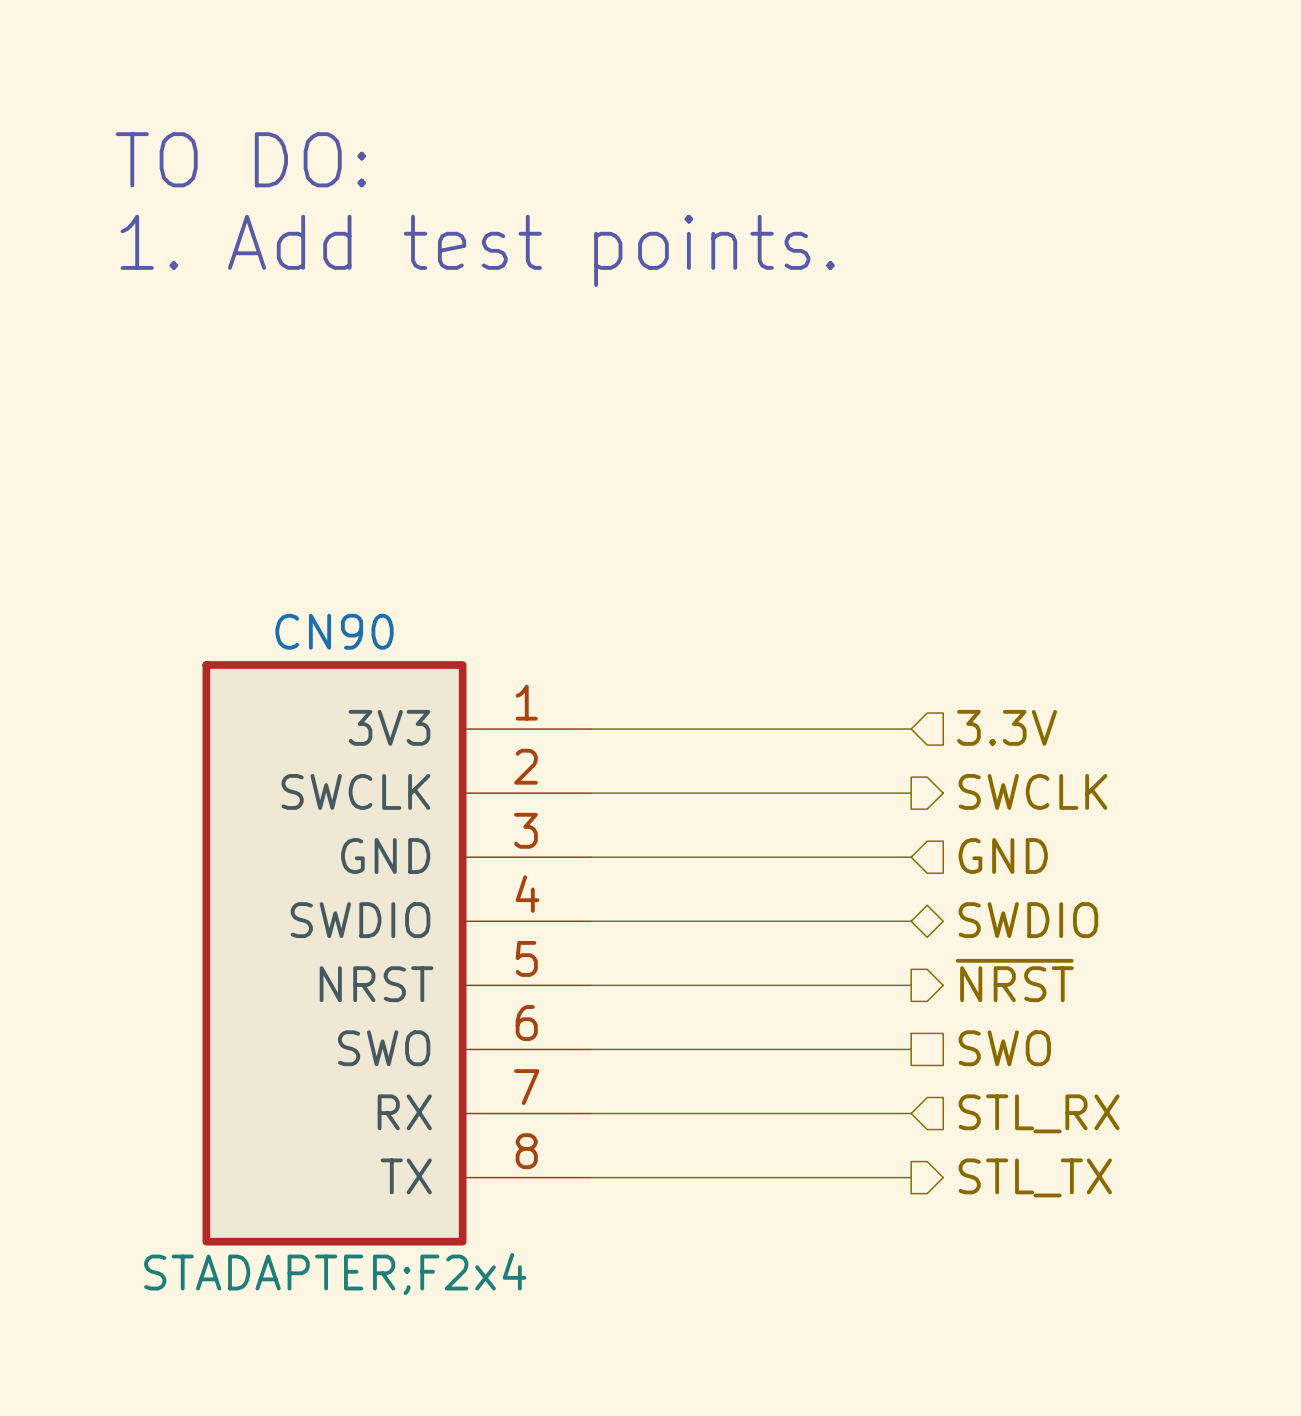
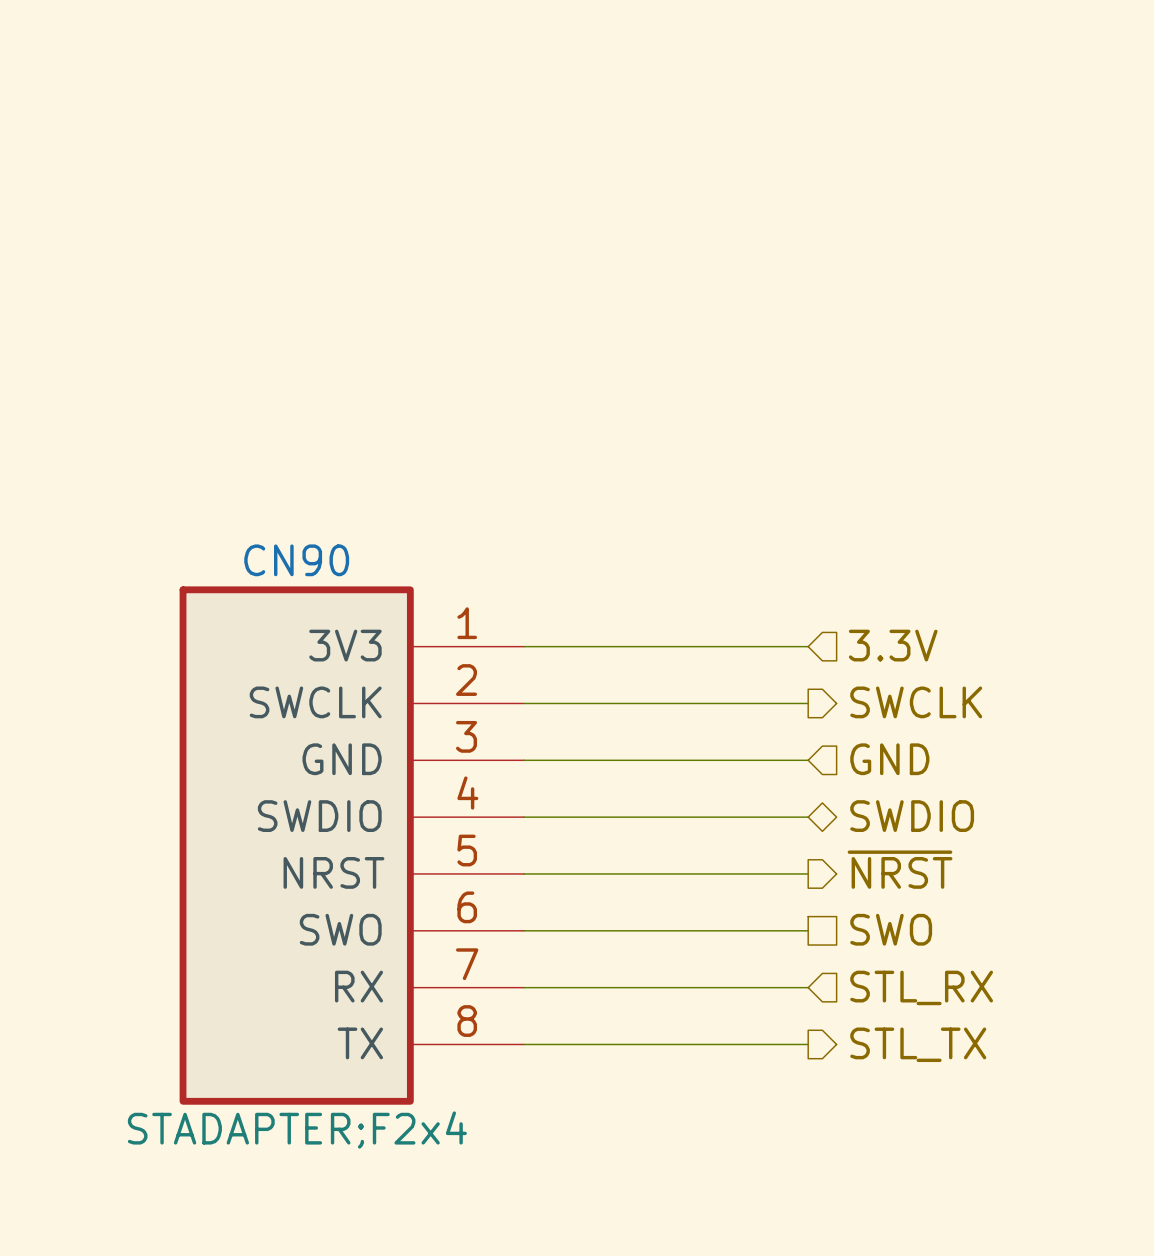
text: TO DO: (240, 159) -> none
text: 1. Add test points. (477, 250) -> none

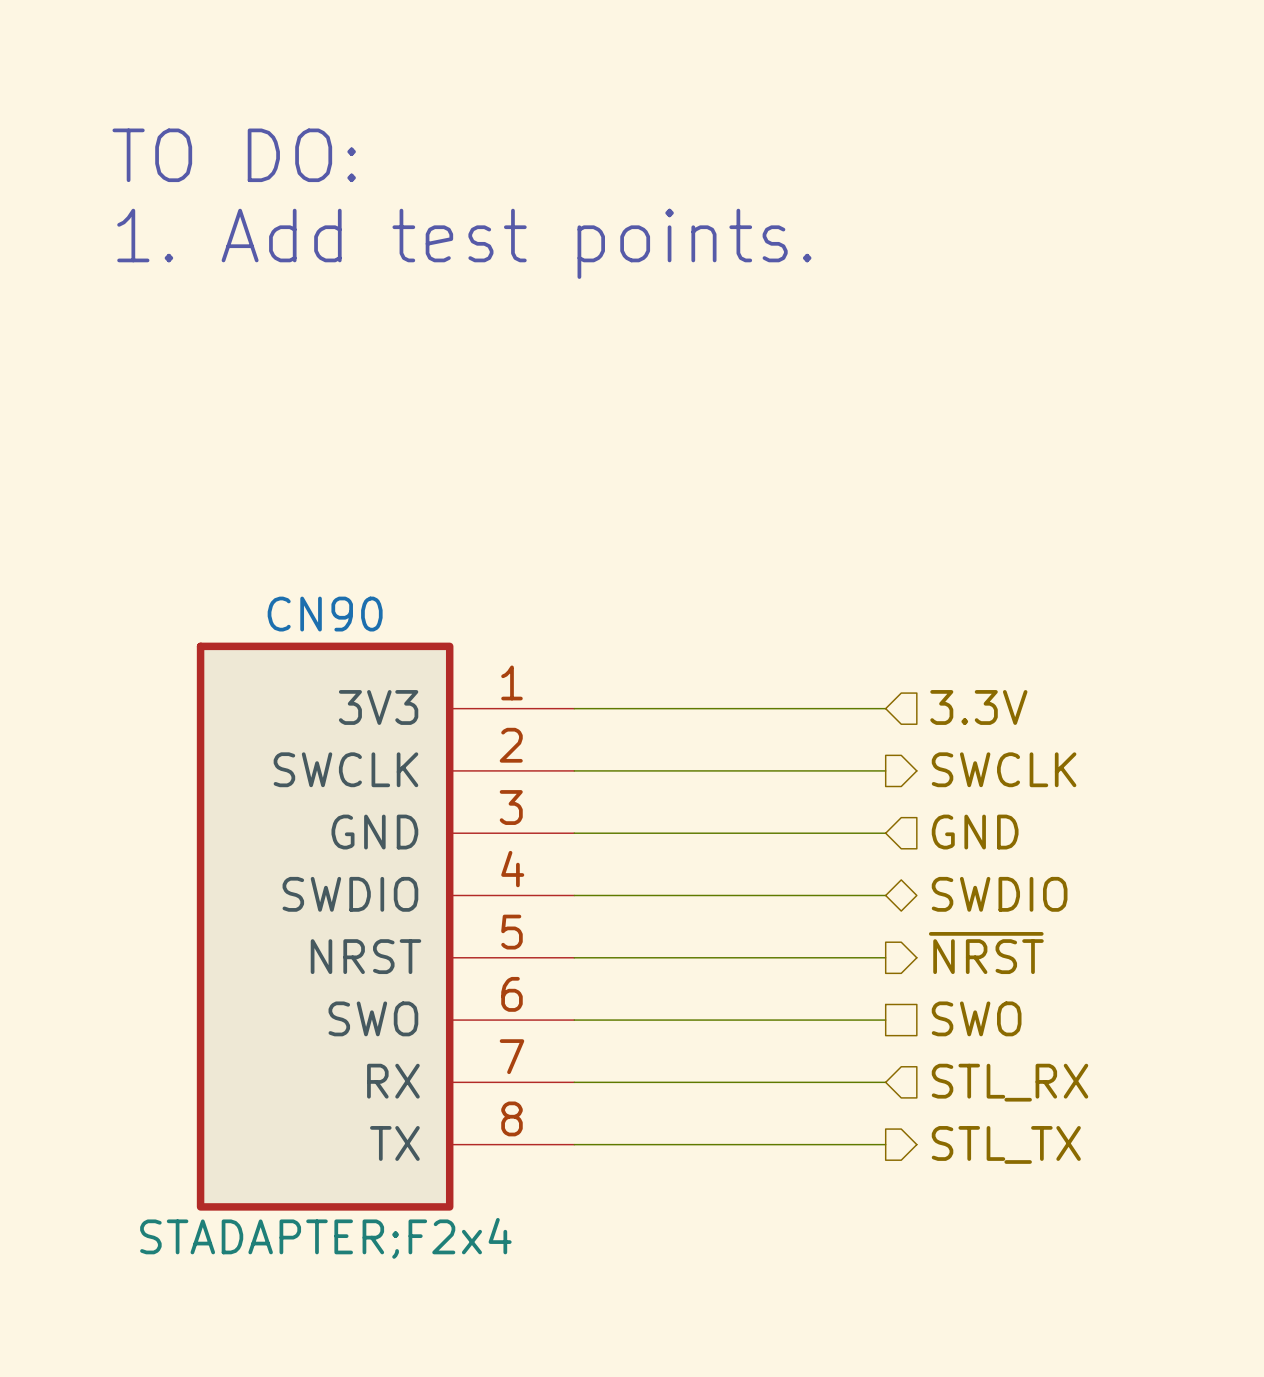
text: none -> TO DO: (234, 155)
text: none -> 1. Add test points. (464, 243)

